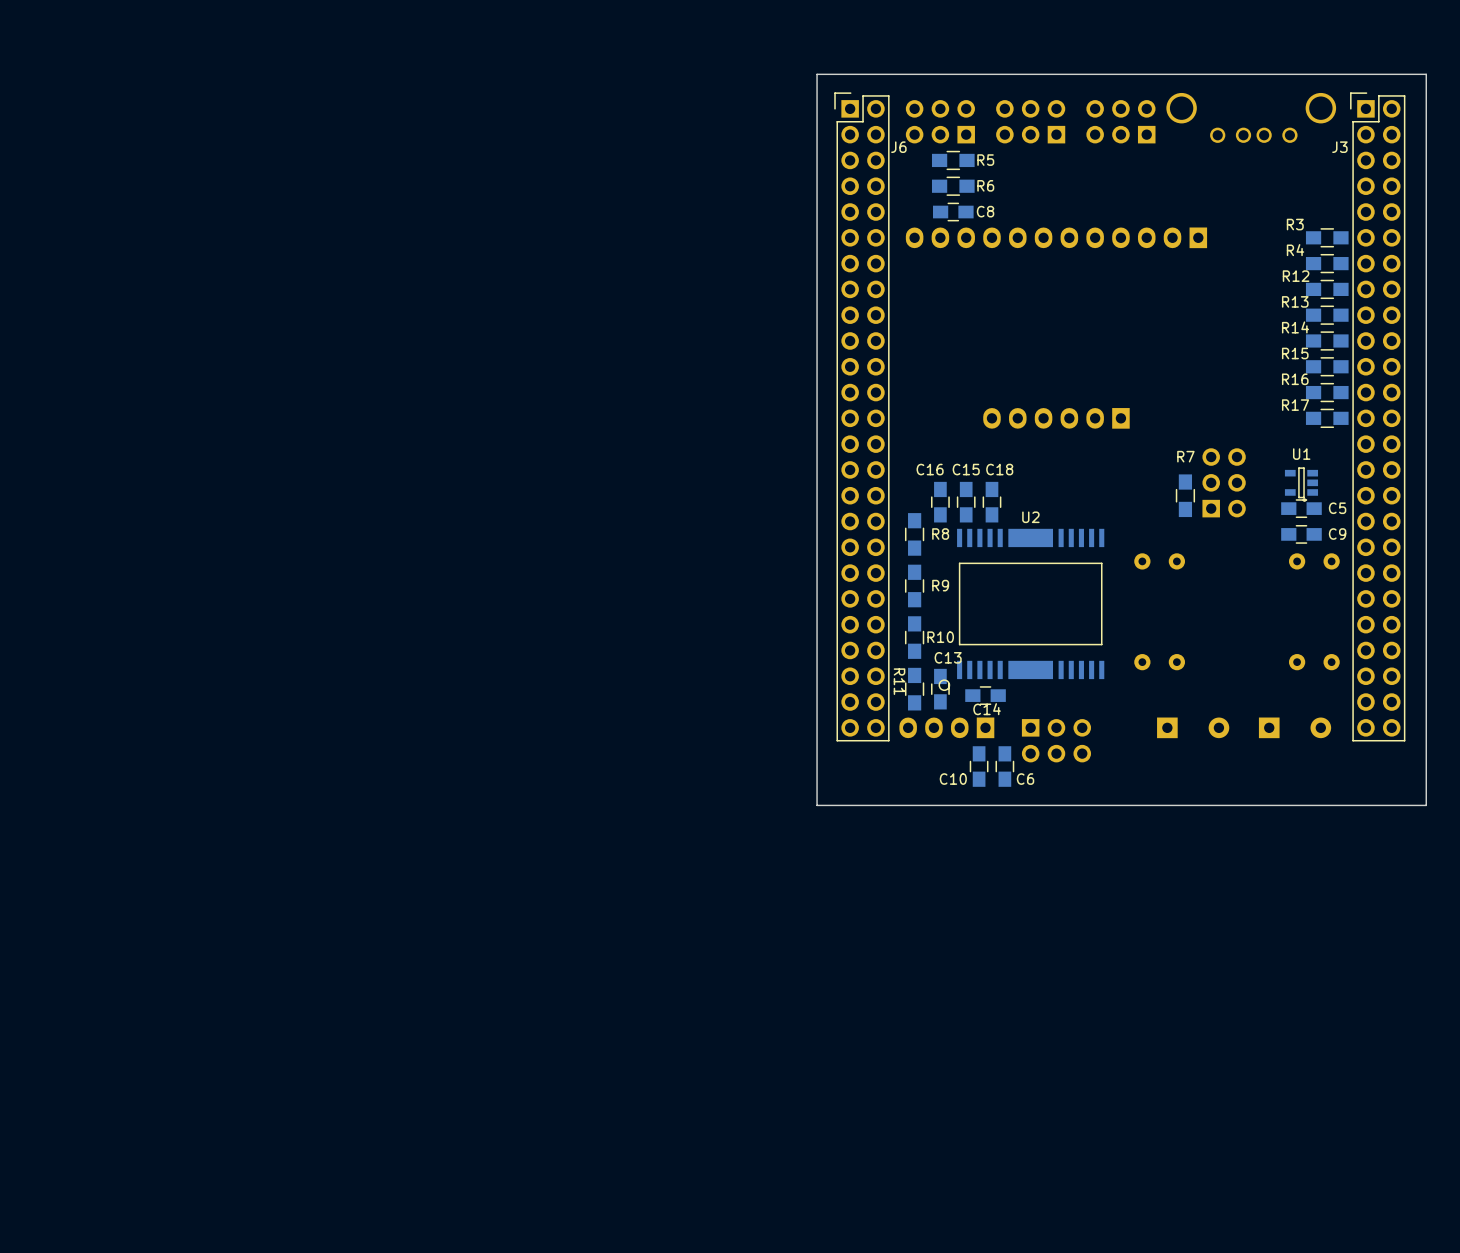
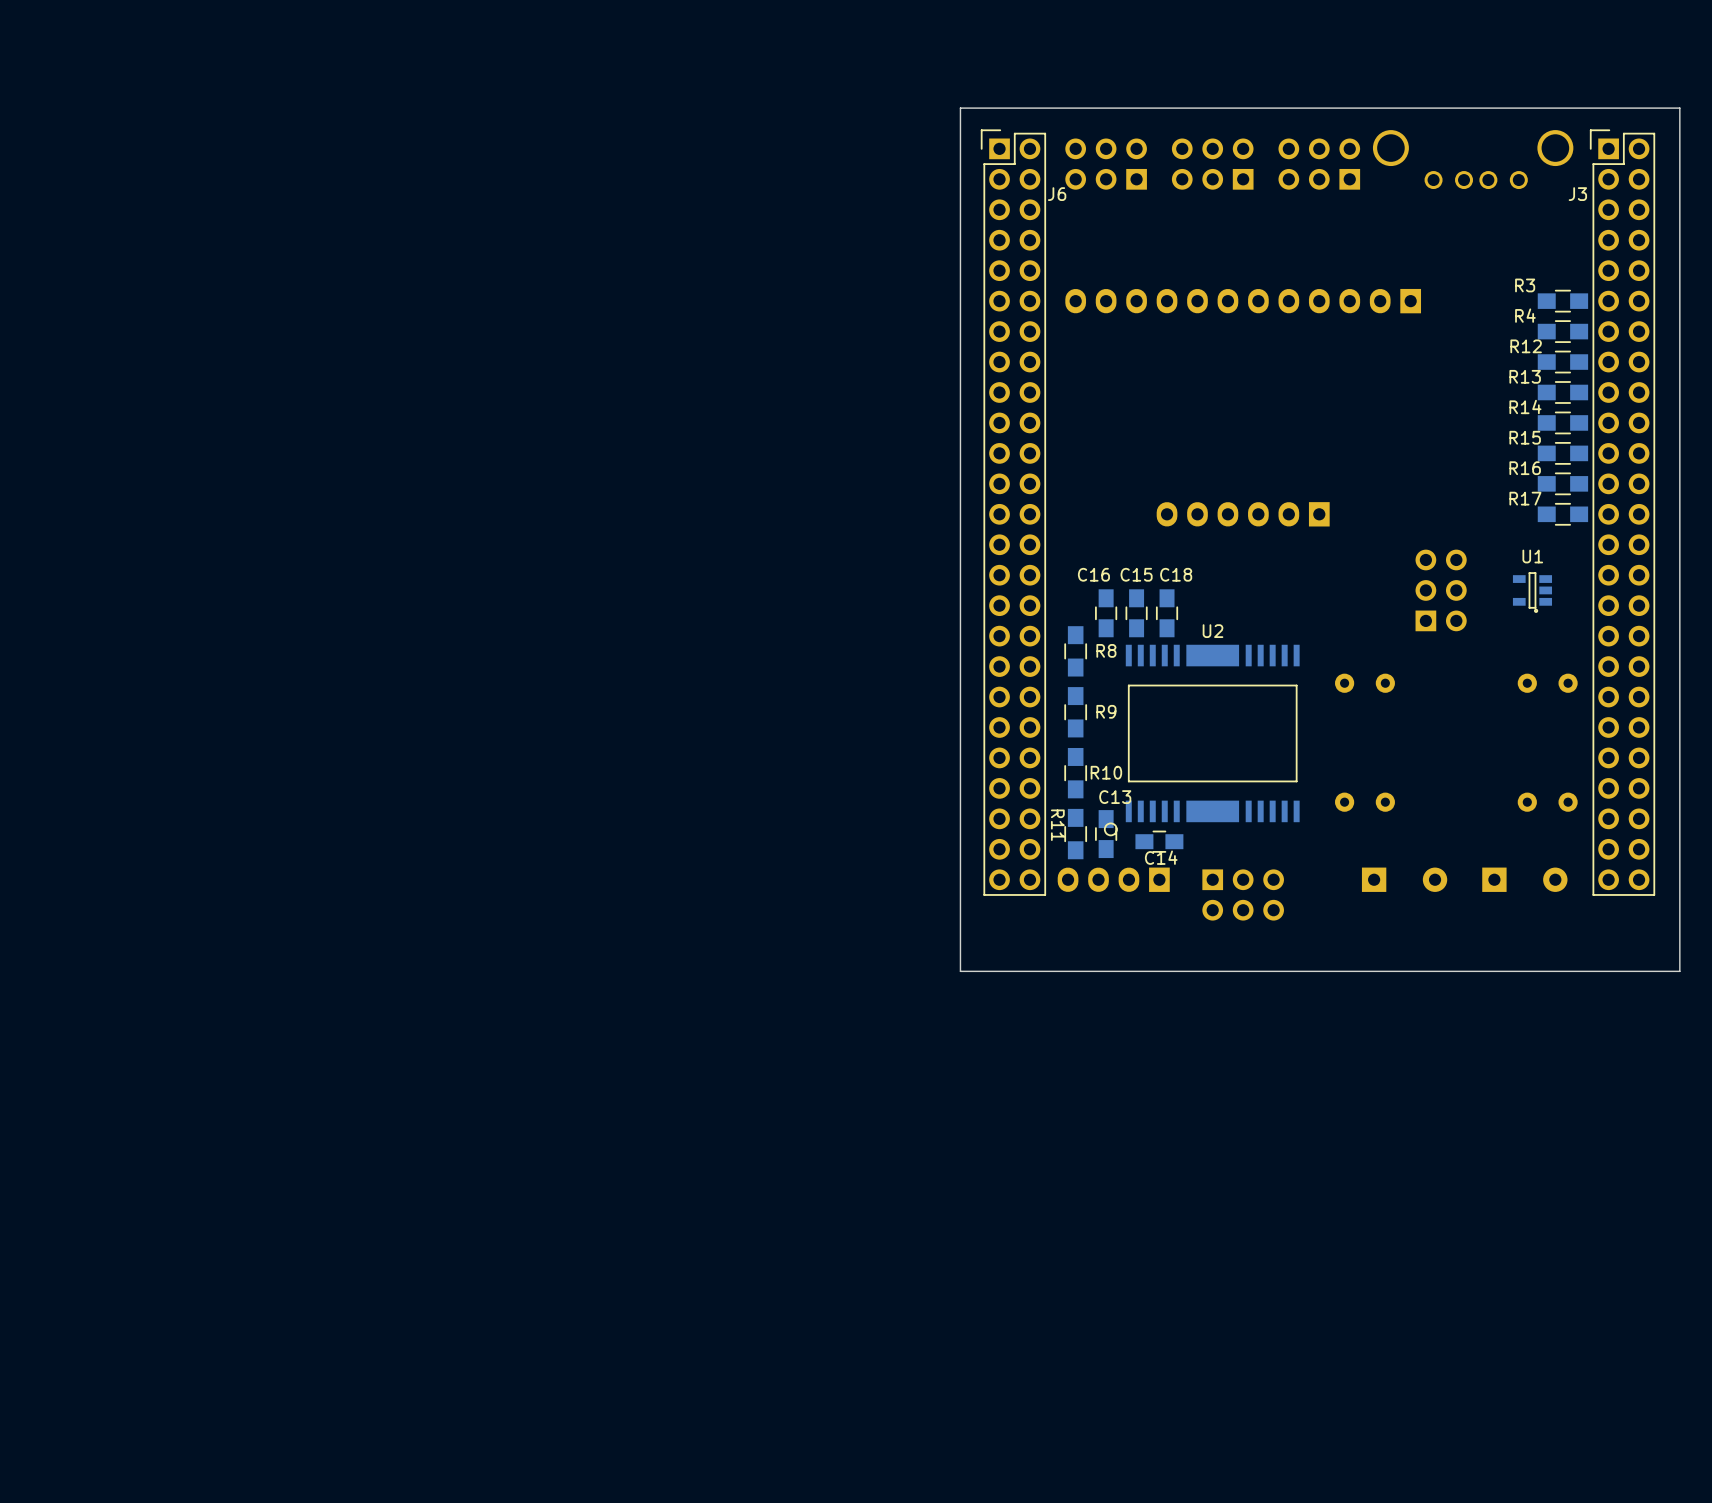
R5: (953, 160) -> none
R6: (953, 186) -> none
C8: (953, 212) -> none
R7: (1185, 495) -> none
C5: (1301, 508) -> none
C9: (1301, 534) -> none
C10: (979, 766) -> none
C6: (1004, 766) -> none

